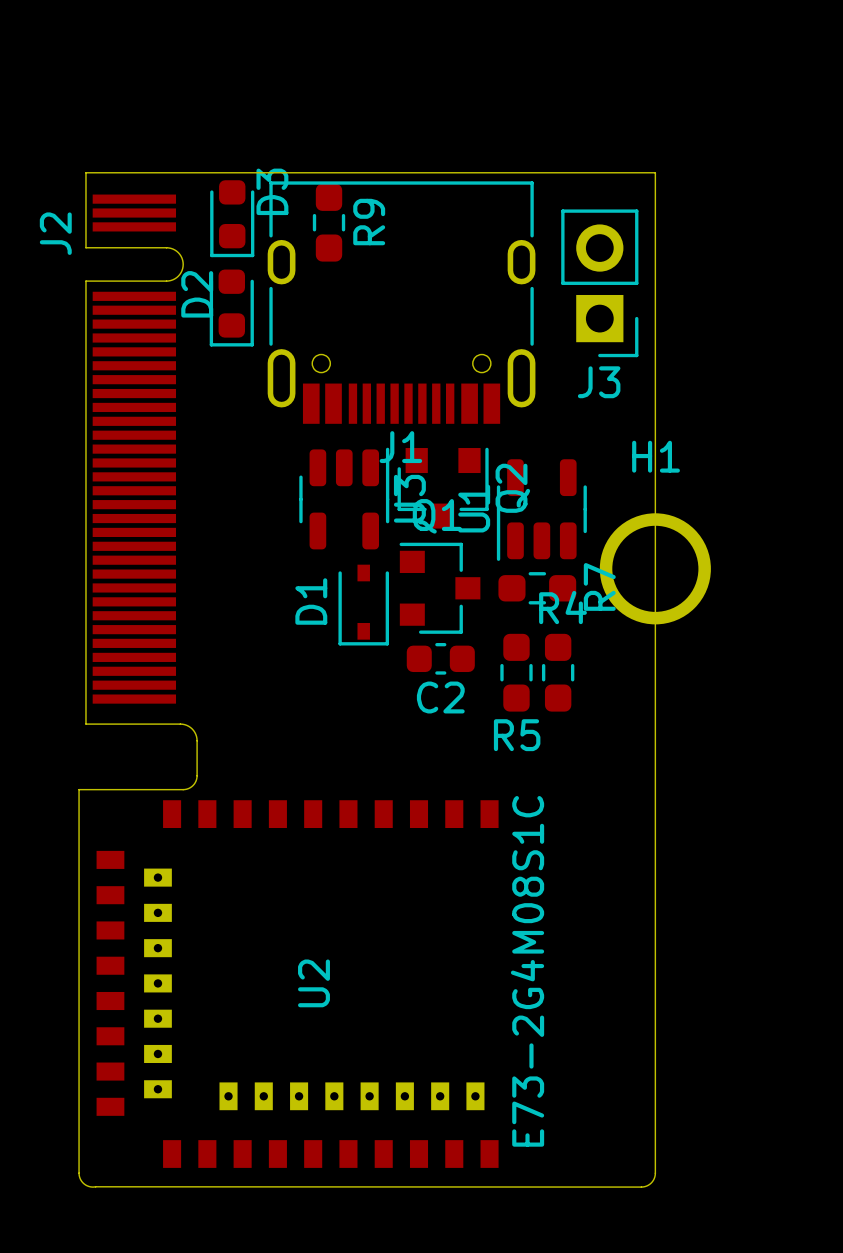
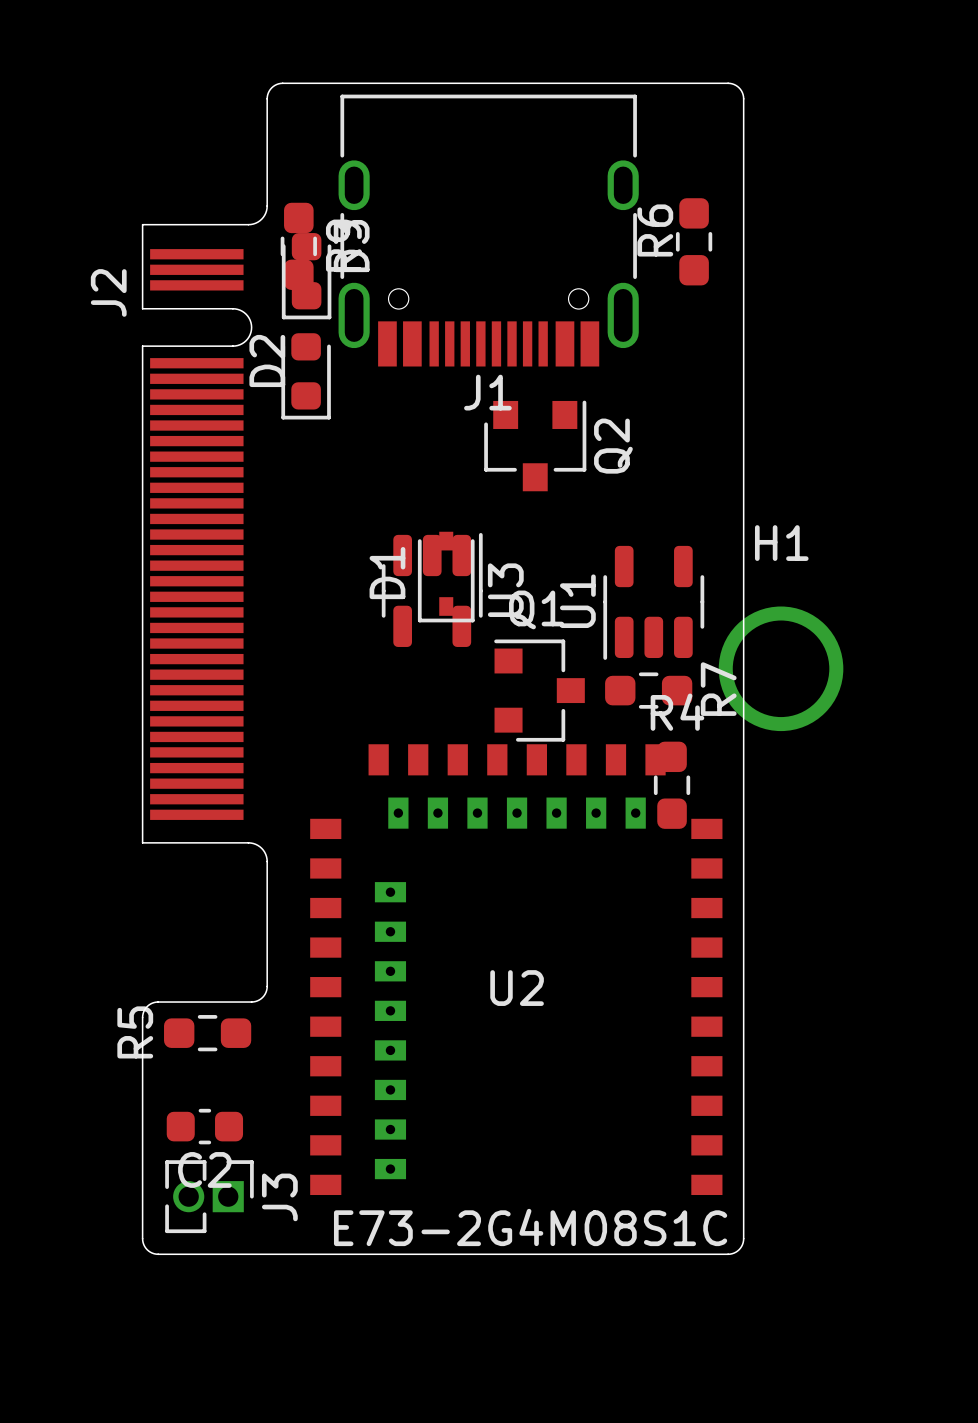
board edge: (180, 172) (655, 172) (655, 1173) (651, 1183) (641, 1187) (92, 1187) (84, 1183) (79, 1173) (79, 789) (185, 789) (193, 785) (197, 775) -> (248, 224) (259, 220) (266, 210) (267, 96) (271, 87) (278, 83) (728, 83) (737, 86) (742, 92) (743, 1238) (740, 1248) (735, 1252) (728, 1254) (158, 1254) (148, 1251) (143, 1244) (142, 1238) (143, 1013) (148, 1005) (156, 1002) (251, 1002) (262, 997) (267, 986) (267, 900)
R6: none -> (694, 241)
J3 footprint: [561, 209, 639, 358] -> [165, 1160, 254, 1234]
R9 position: (329, 222) -> (298, 246)
J1 position: (401, 302) -> (488, 230)
J3 name position: J3 (599, 382) -> J3 (279, 1197)
Q2 position: (443, 488) -> (535, 445)
D1 position: (363, 605) -> (446, 577)
C2 position: (440, 658) -> (204, 1126)
R5 rotation: 0° (516, 672) -> 90° clockwise (207, 1033)
R5 position: (516, 672) -> (207, 1033)
U2 rotation: 0° (297, 984) -> 90° clockwise (516, 969)

